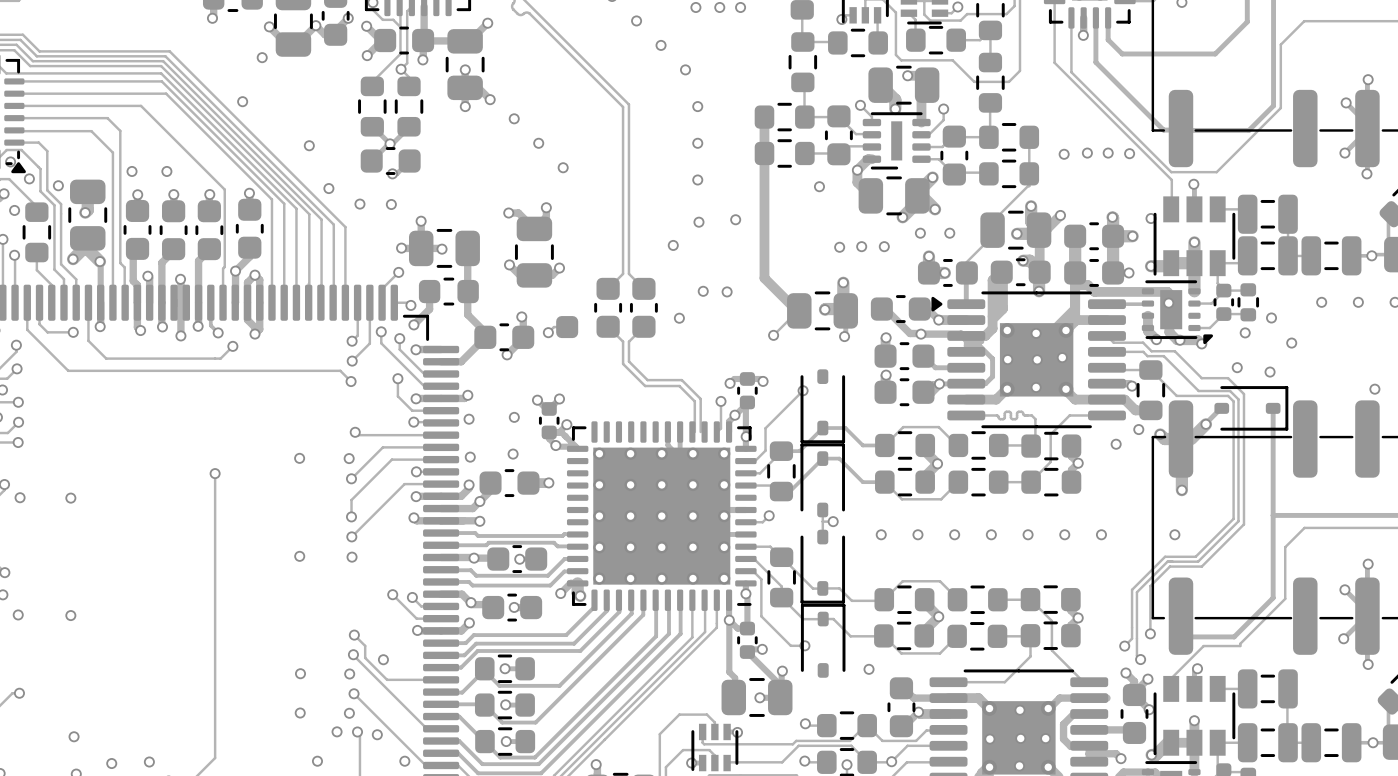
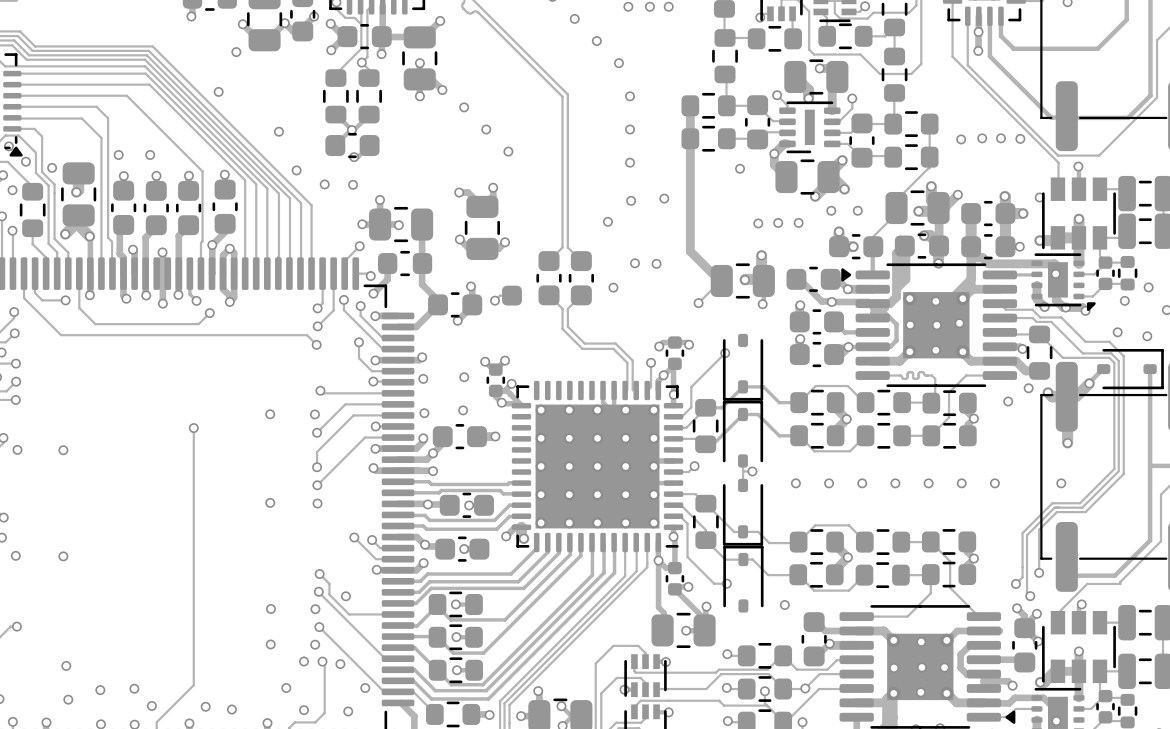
track: none -> (978, 31) (978, 50)
via: none -> (978, 50)

